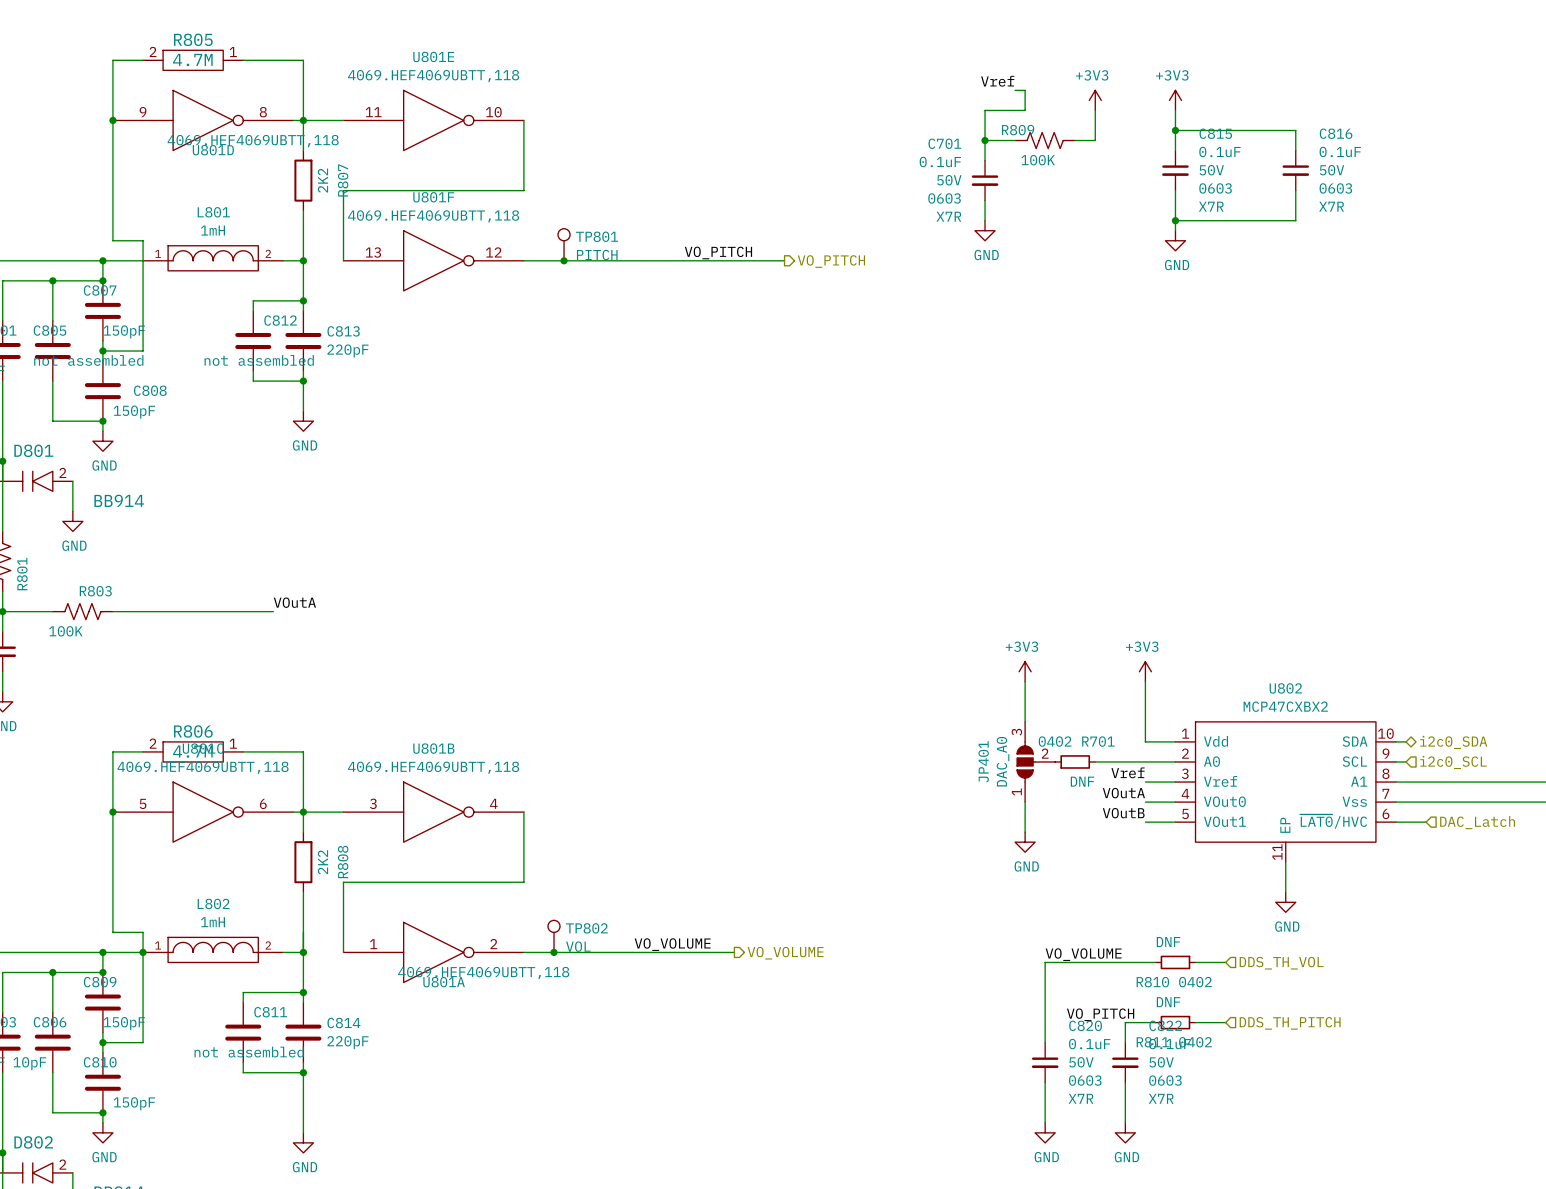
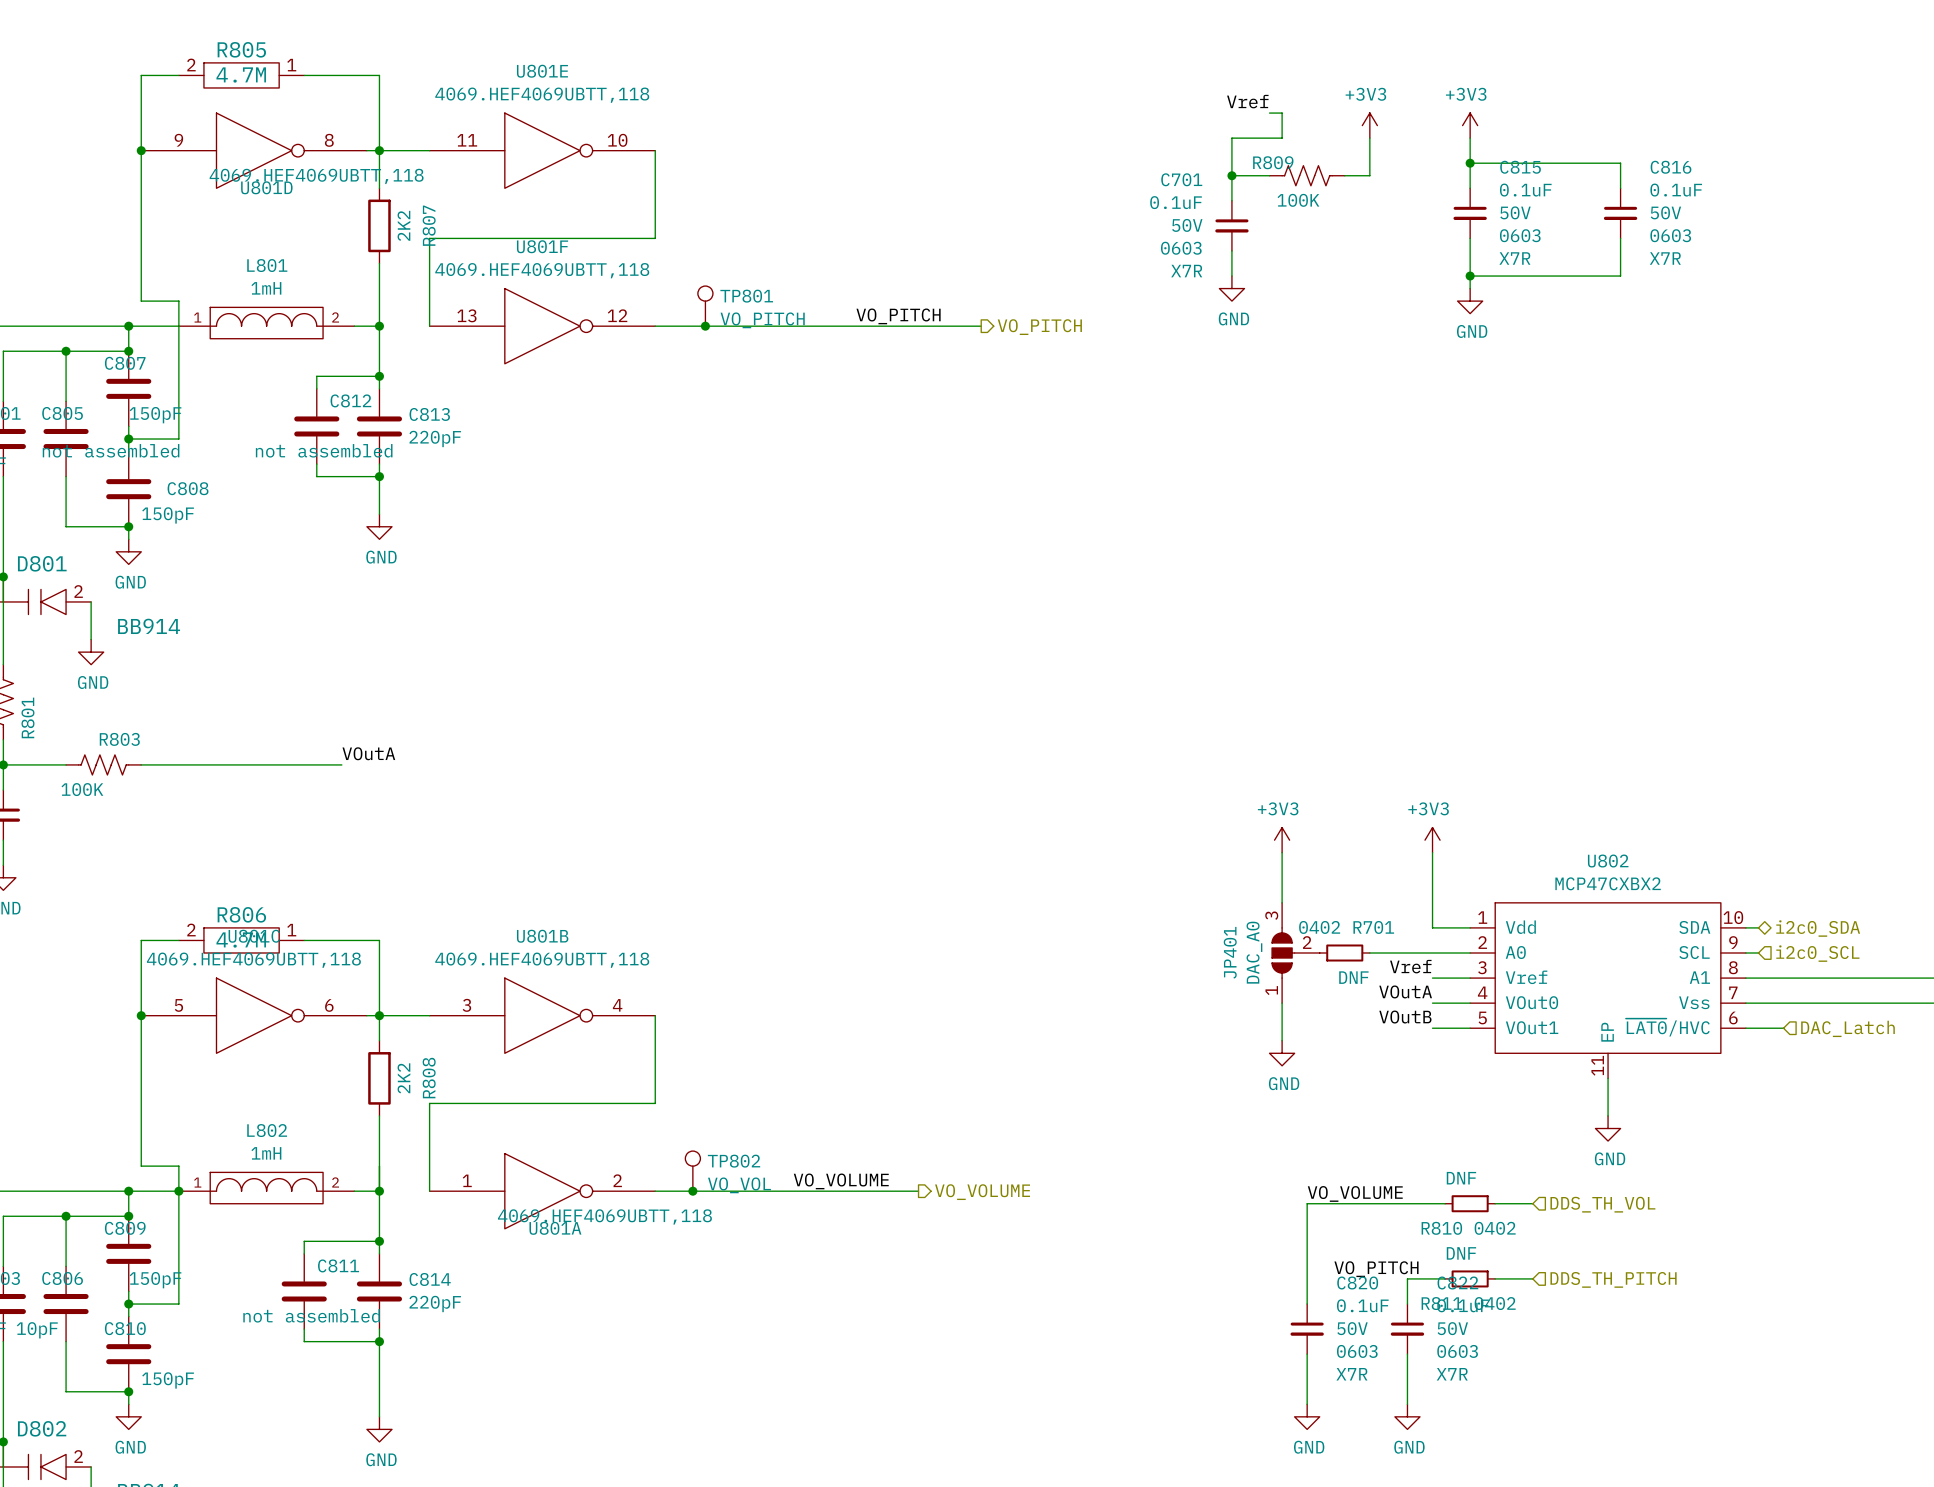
TP801 value: PITCH (597, 255) -> VO_PITCH (762, 320)
TP802 value: VOL (578, 946) -> VO_VOL (739, 1185)

